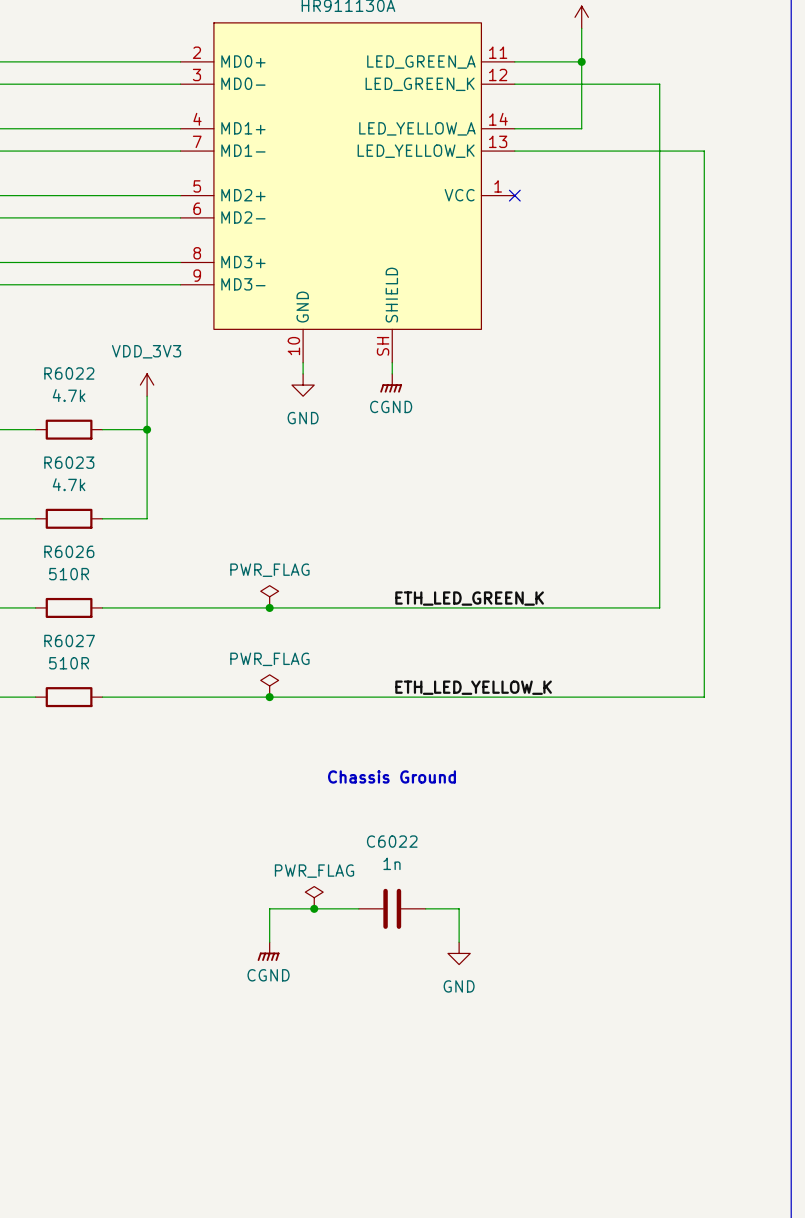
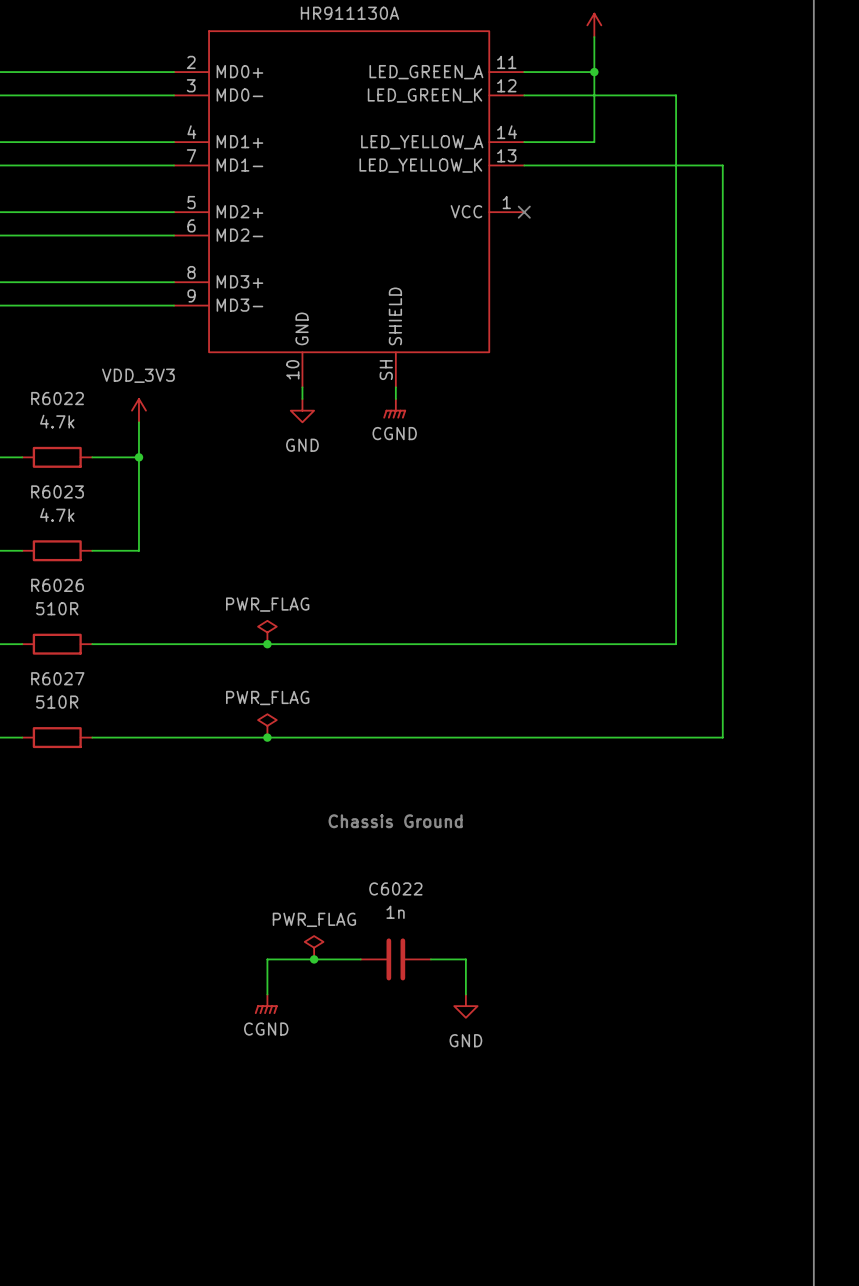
label: ETH_LED_GREEN_K (469, 598) -> none
label: ETH_LED_YELLOW_K (473, 687) -> none

